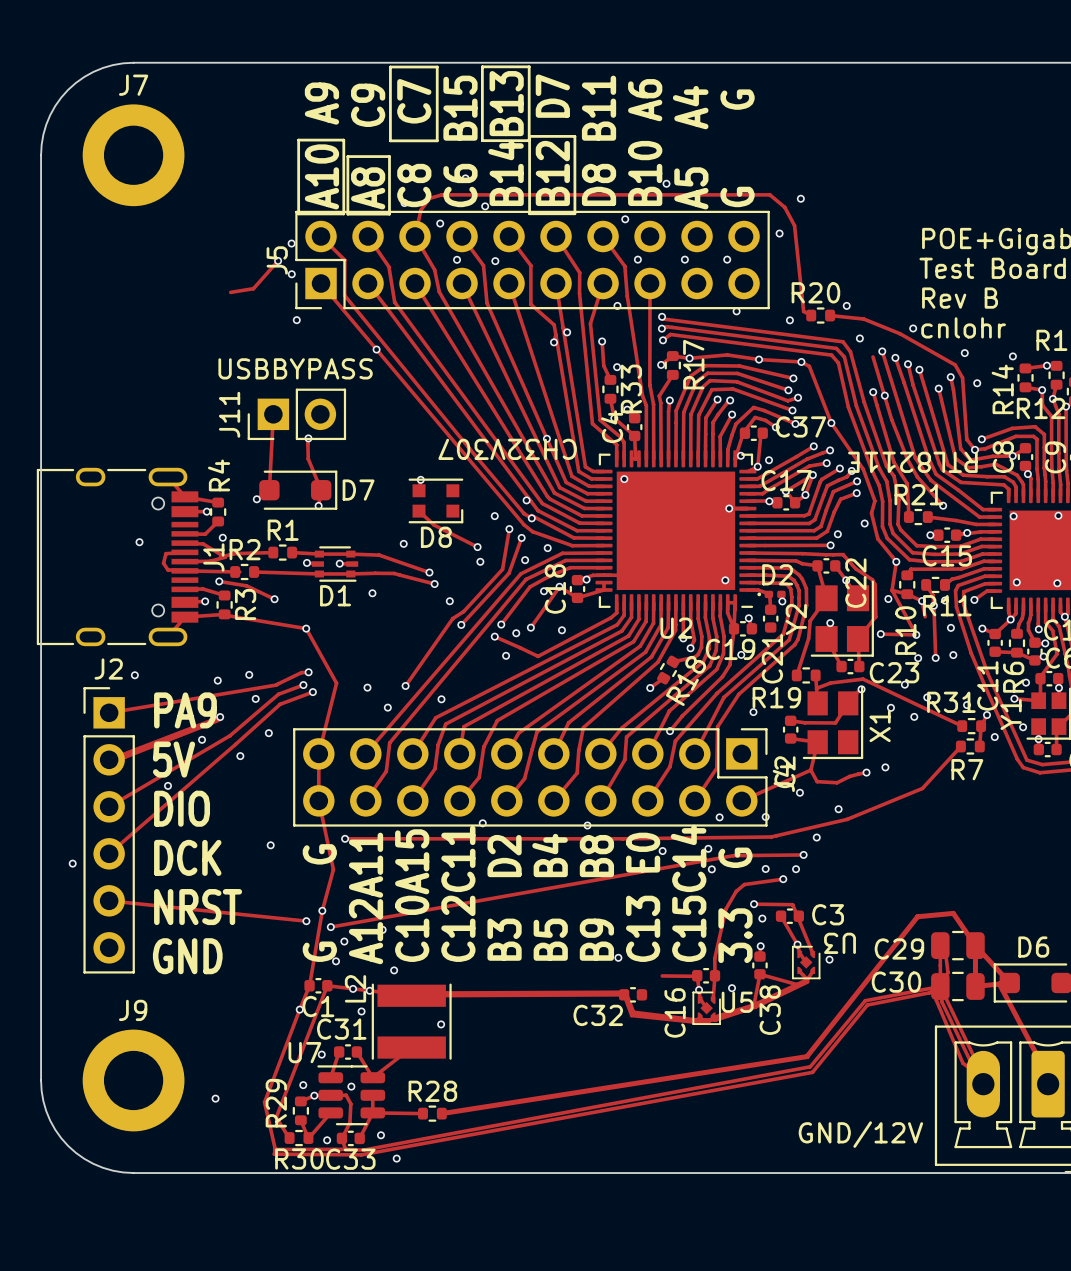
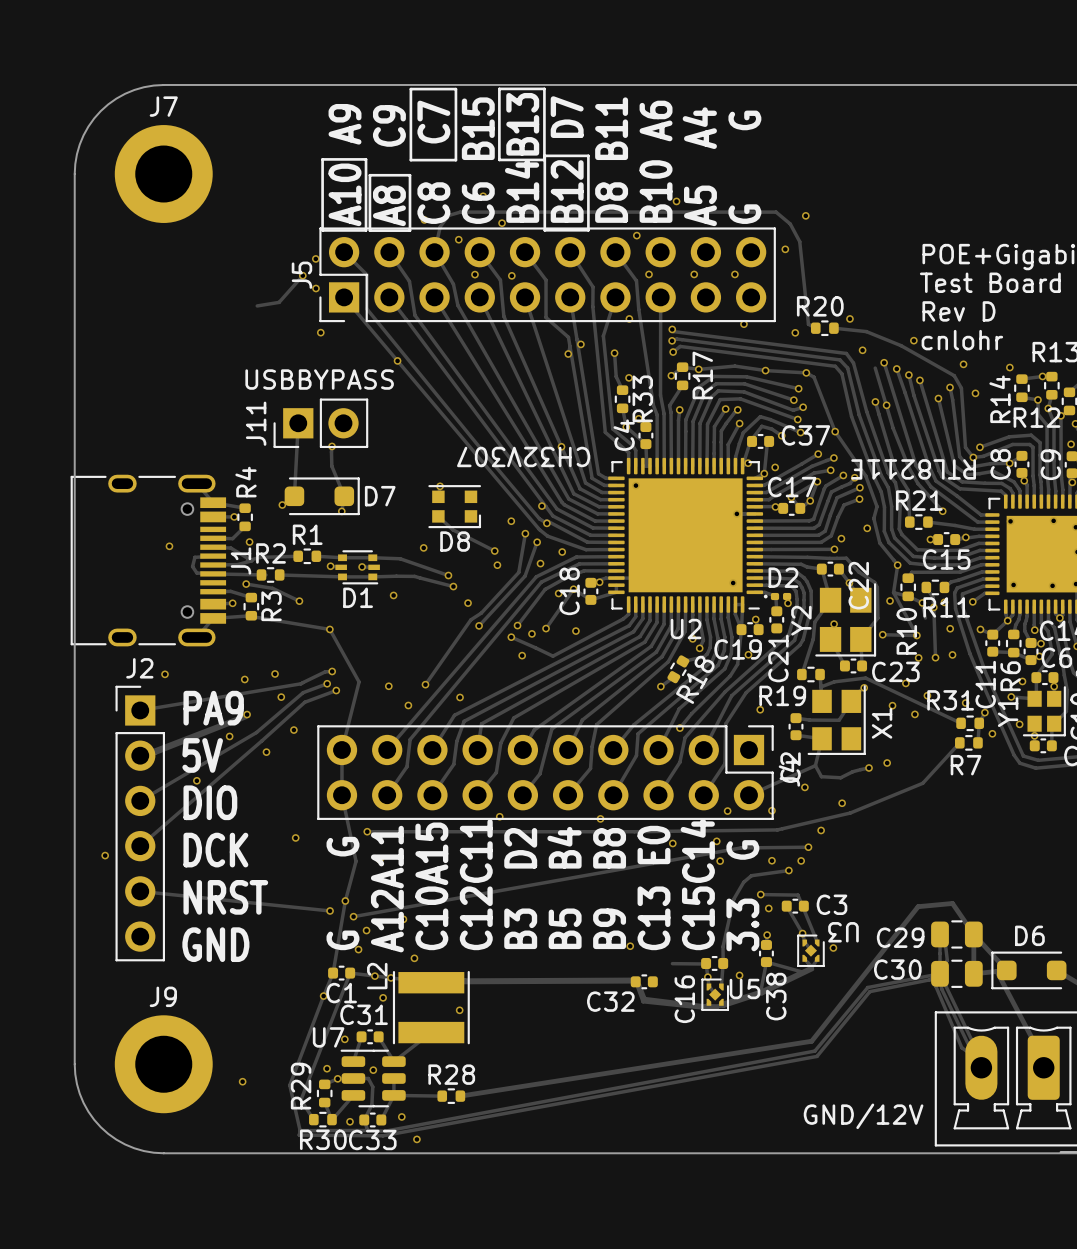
text: Rev B (960, 298) -> Rev D (958, 311)

